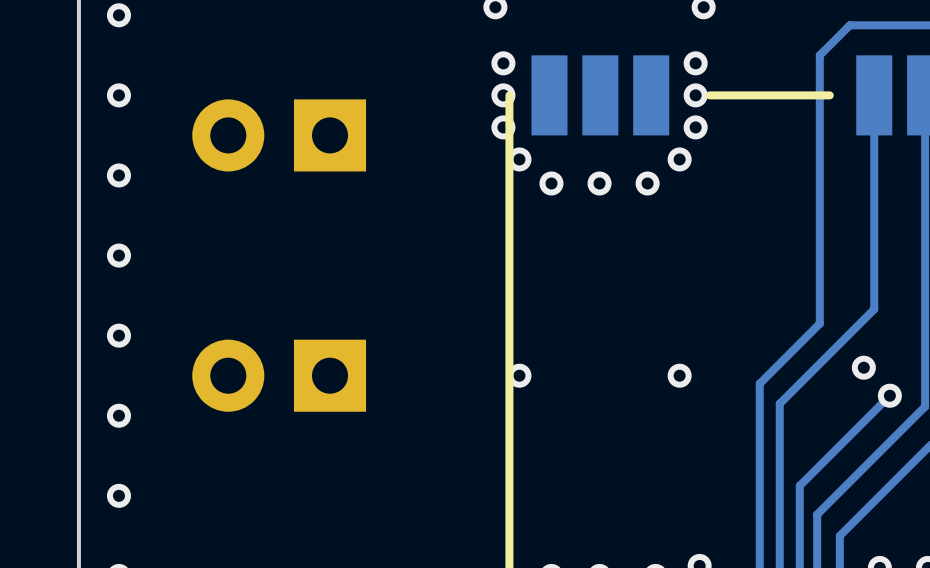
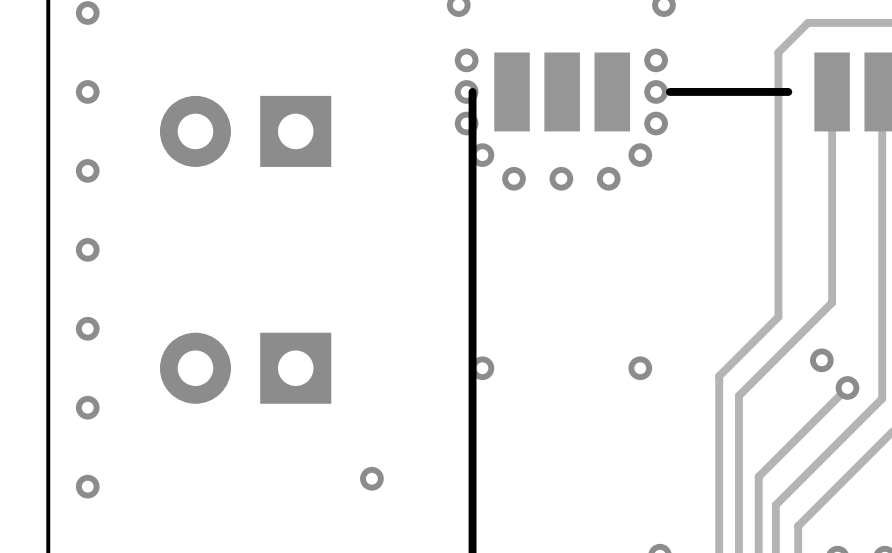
via: none -> (371, 478)

